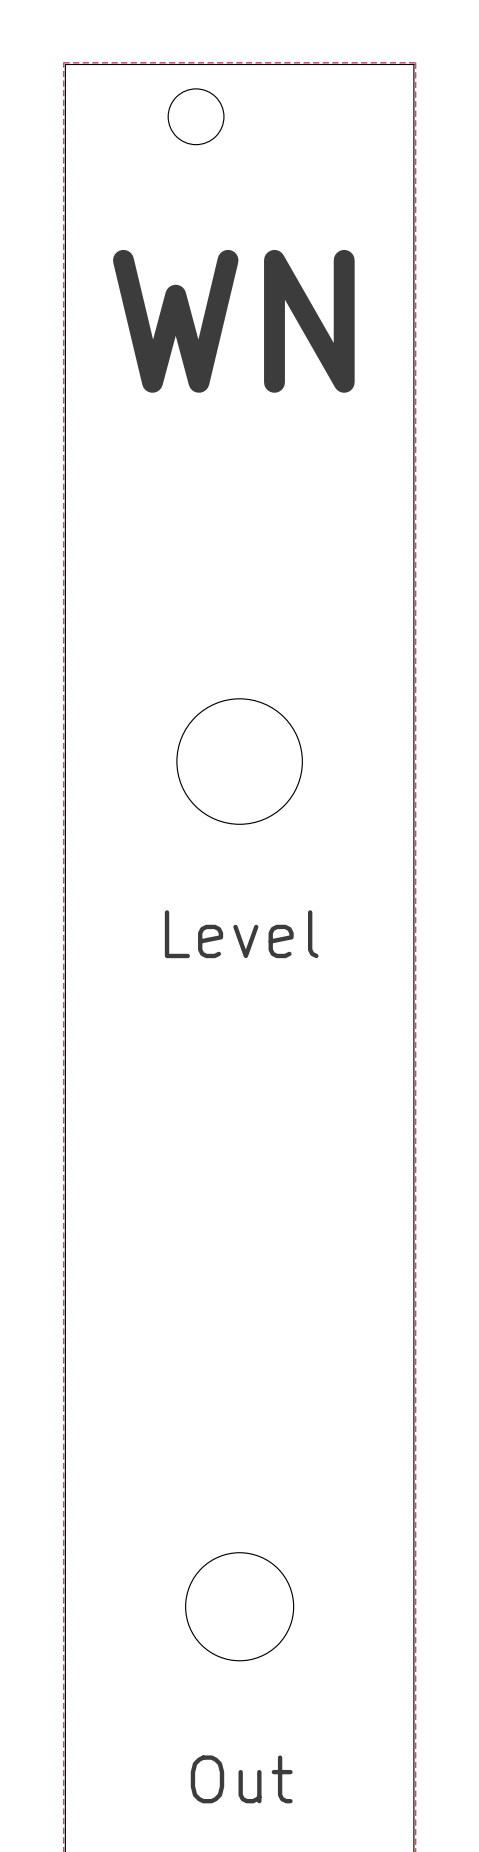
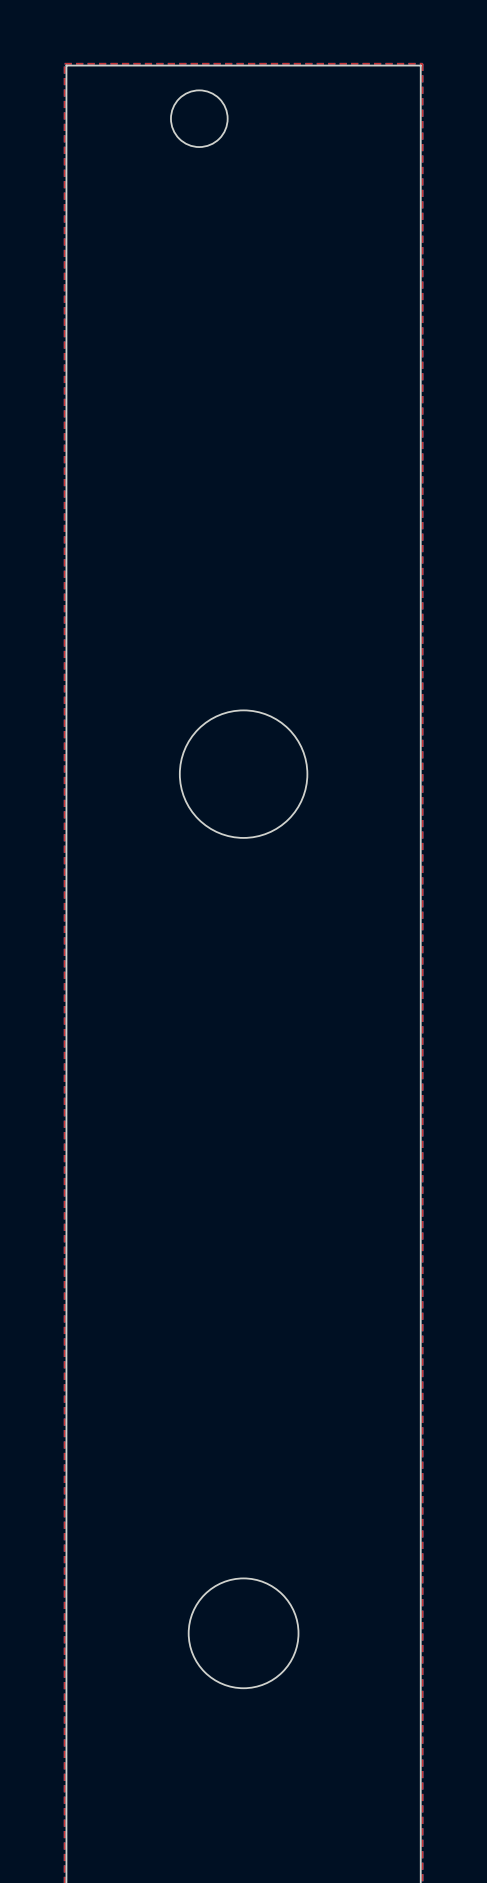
text: WN (233, 321) -> none
text: Level (241, 934) -> none
text: Out (241, 1779) -> none

